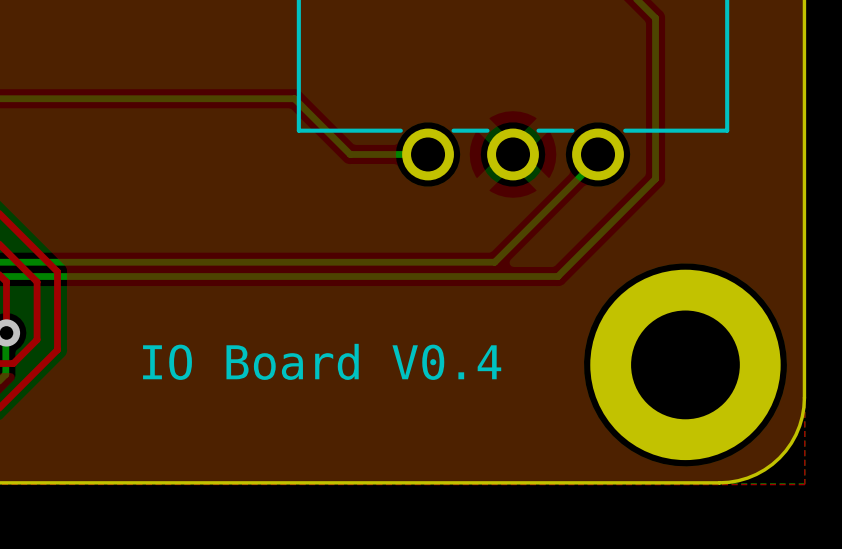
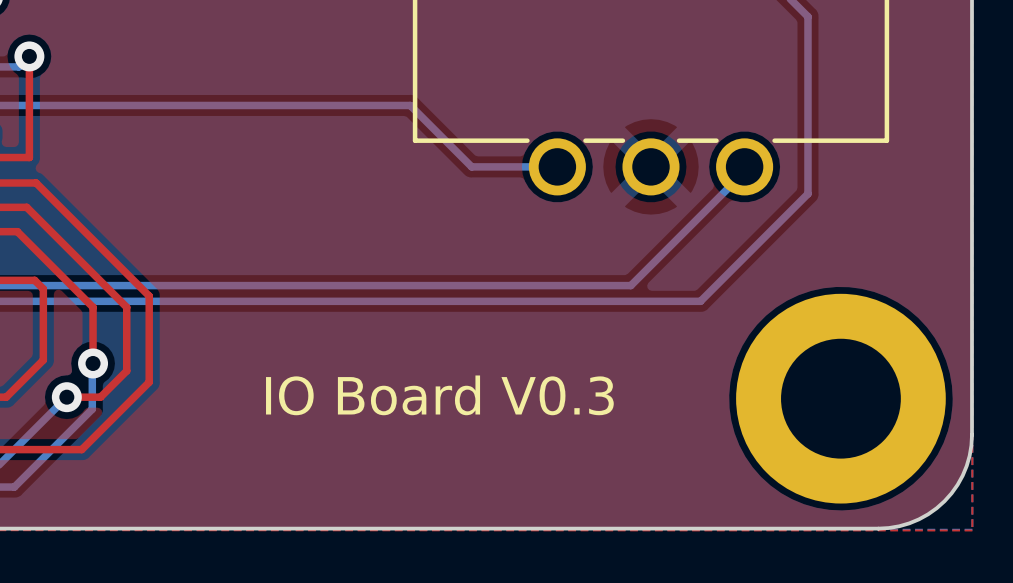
text: IO Board V0.4 (322, 361) -> IO Board V0.3 (439, 395)

